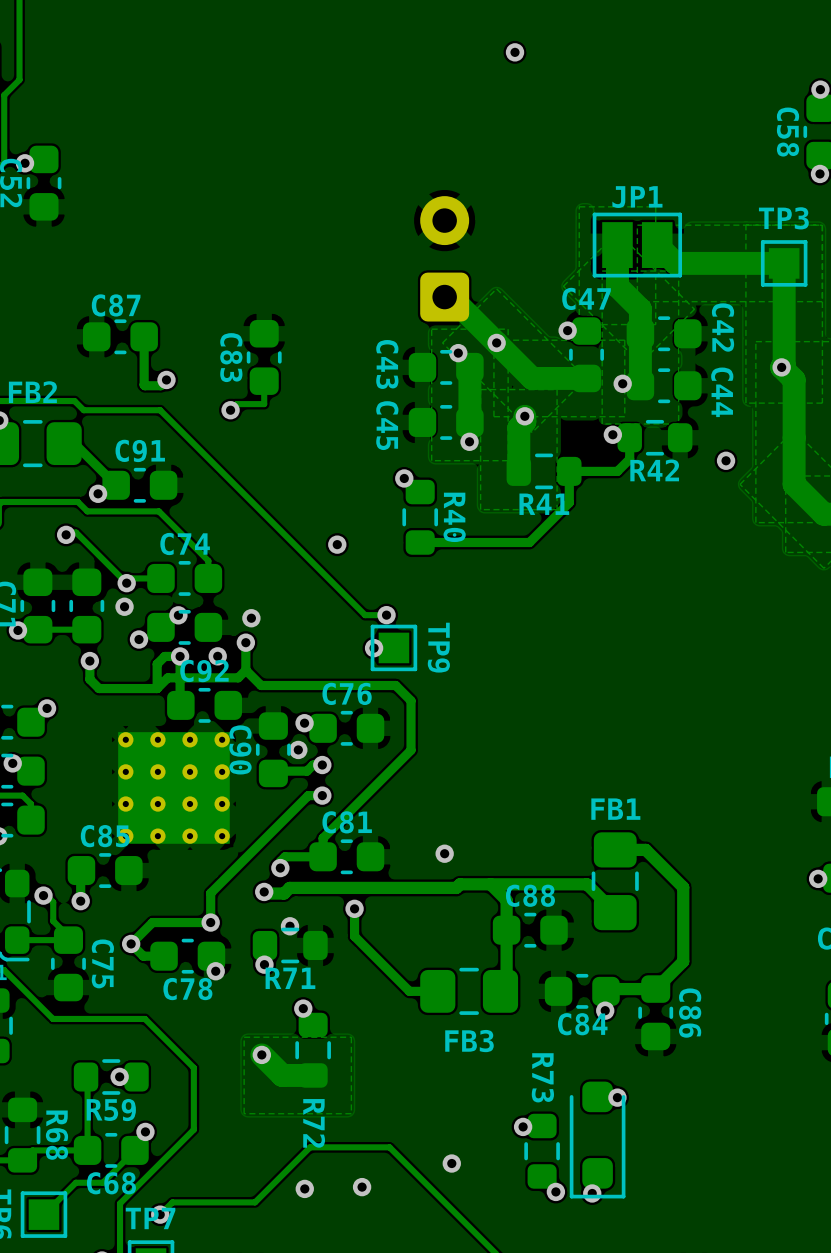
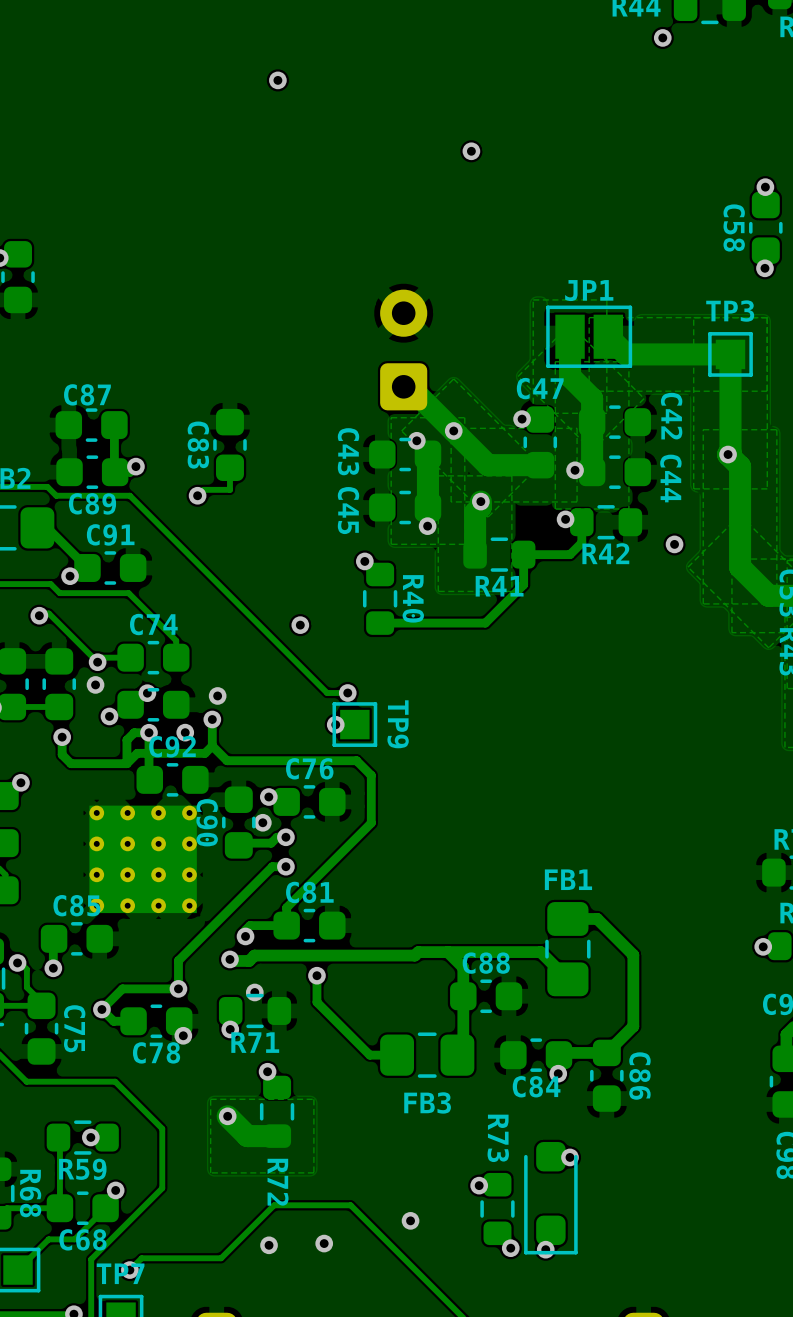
C89: none -> (92, 472)
via: (444, 853) -> none

